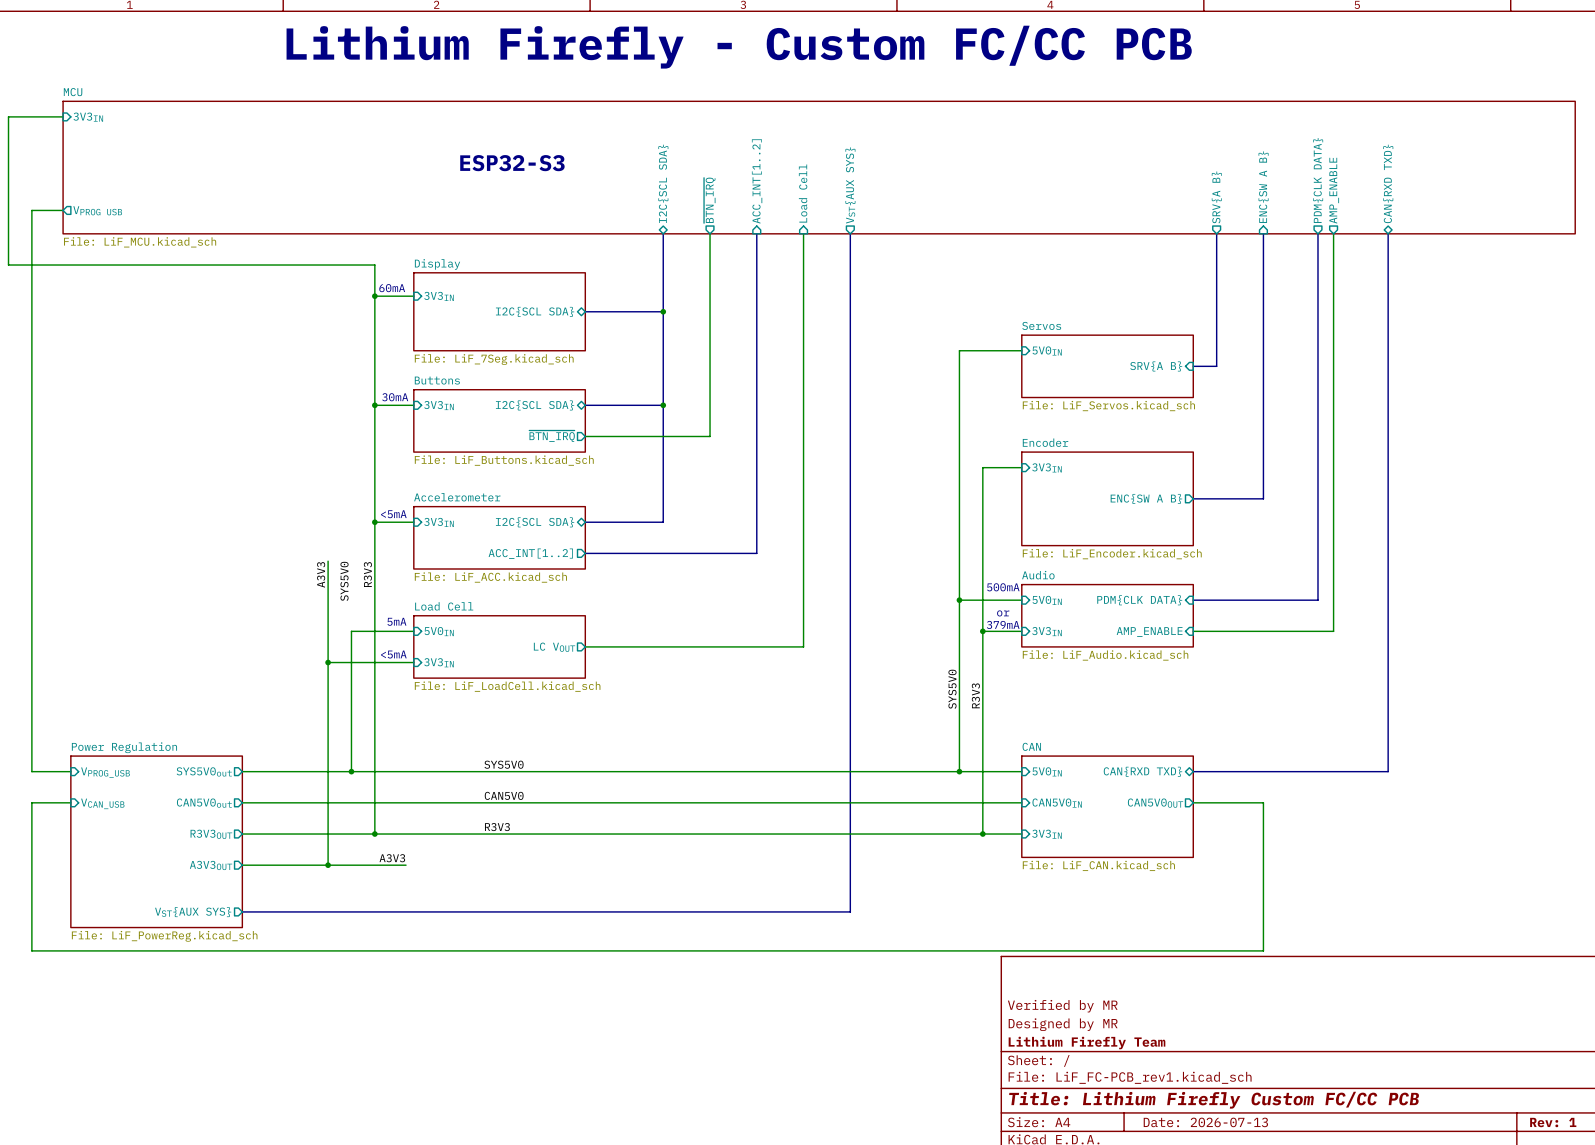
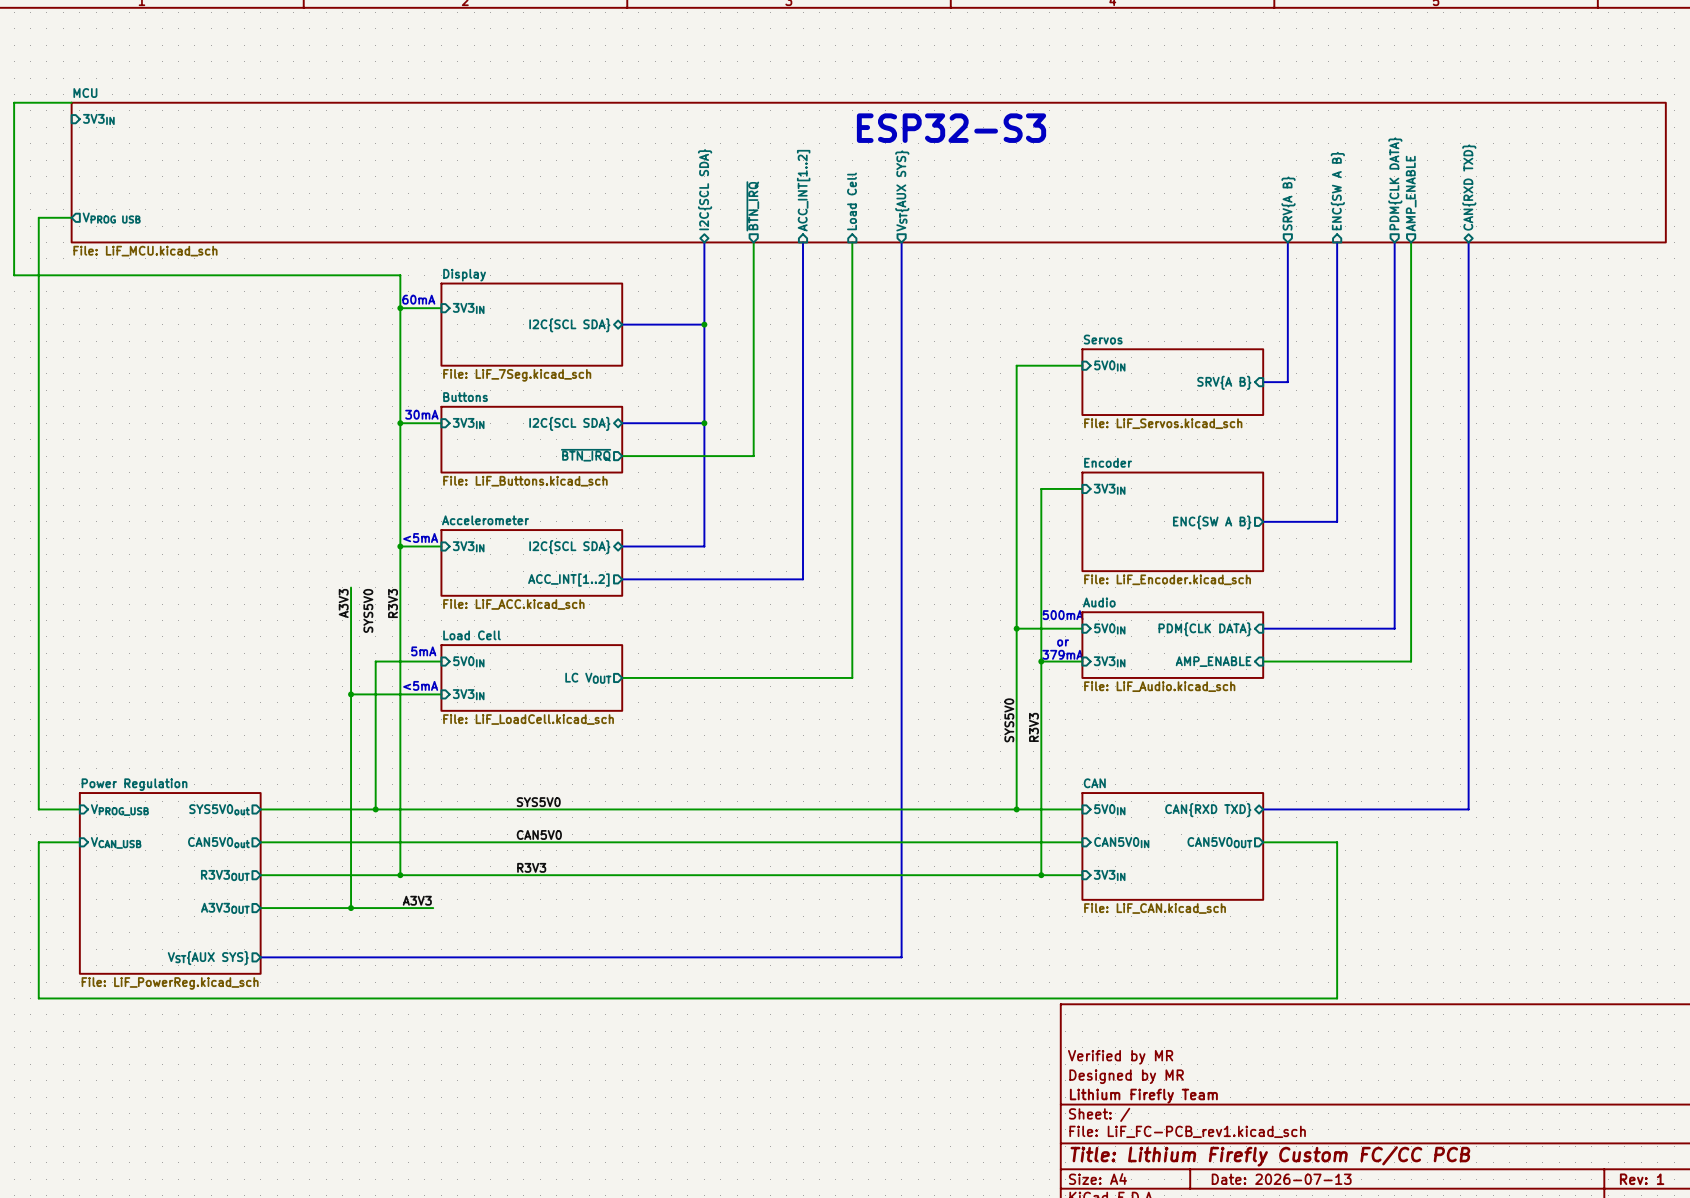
text: Lithium Firefly - Custom FC/CC PCB (739, 47) -> none
wire: (8, 116) (63, 116) -> (14, 119) (14, 102) (71, 102)
text: none -> ESP32-S3 (951, 128)
text: ESP32-S3 (512, 163) -> none

